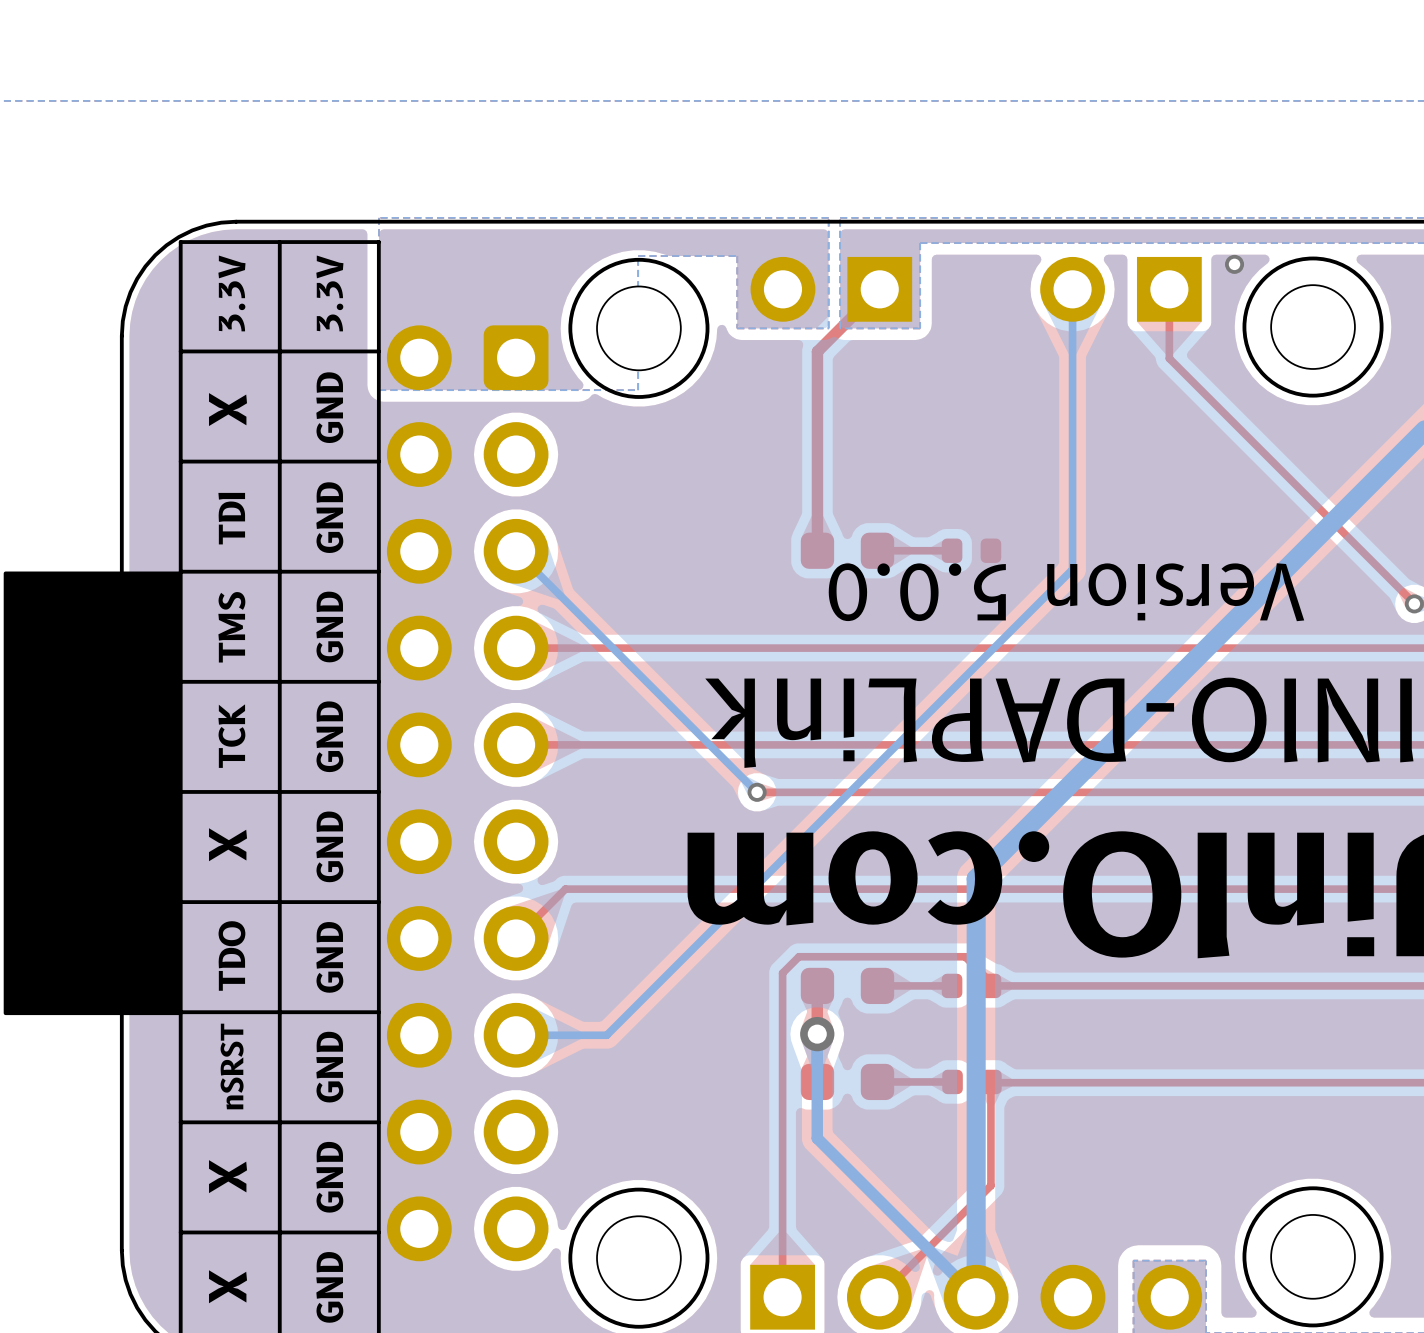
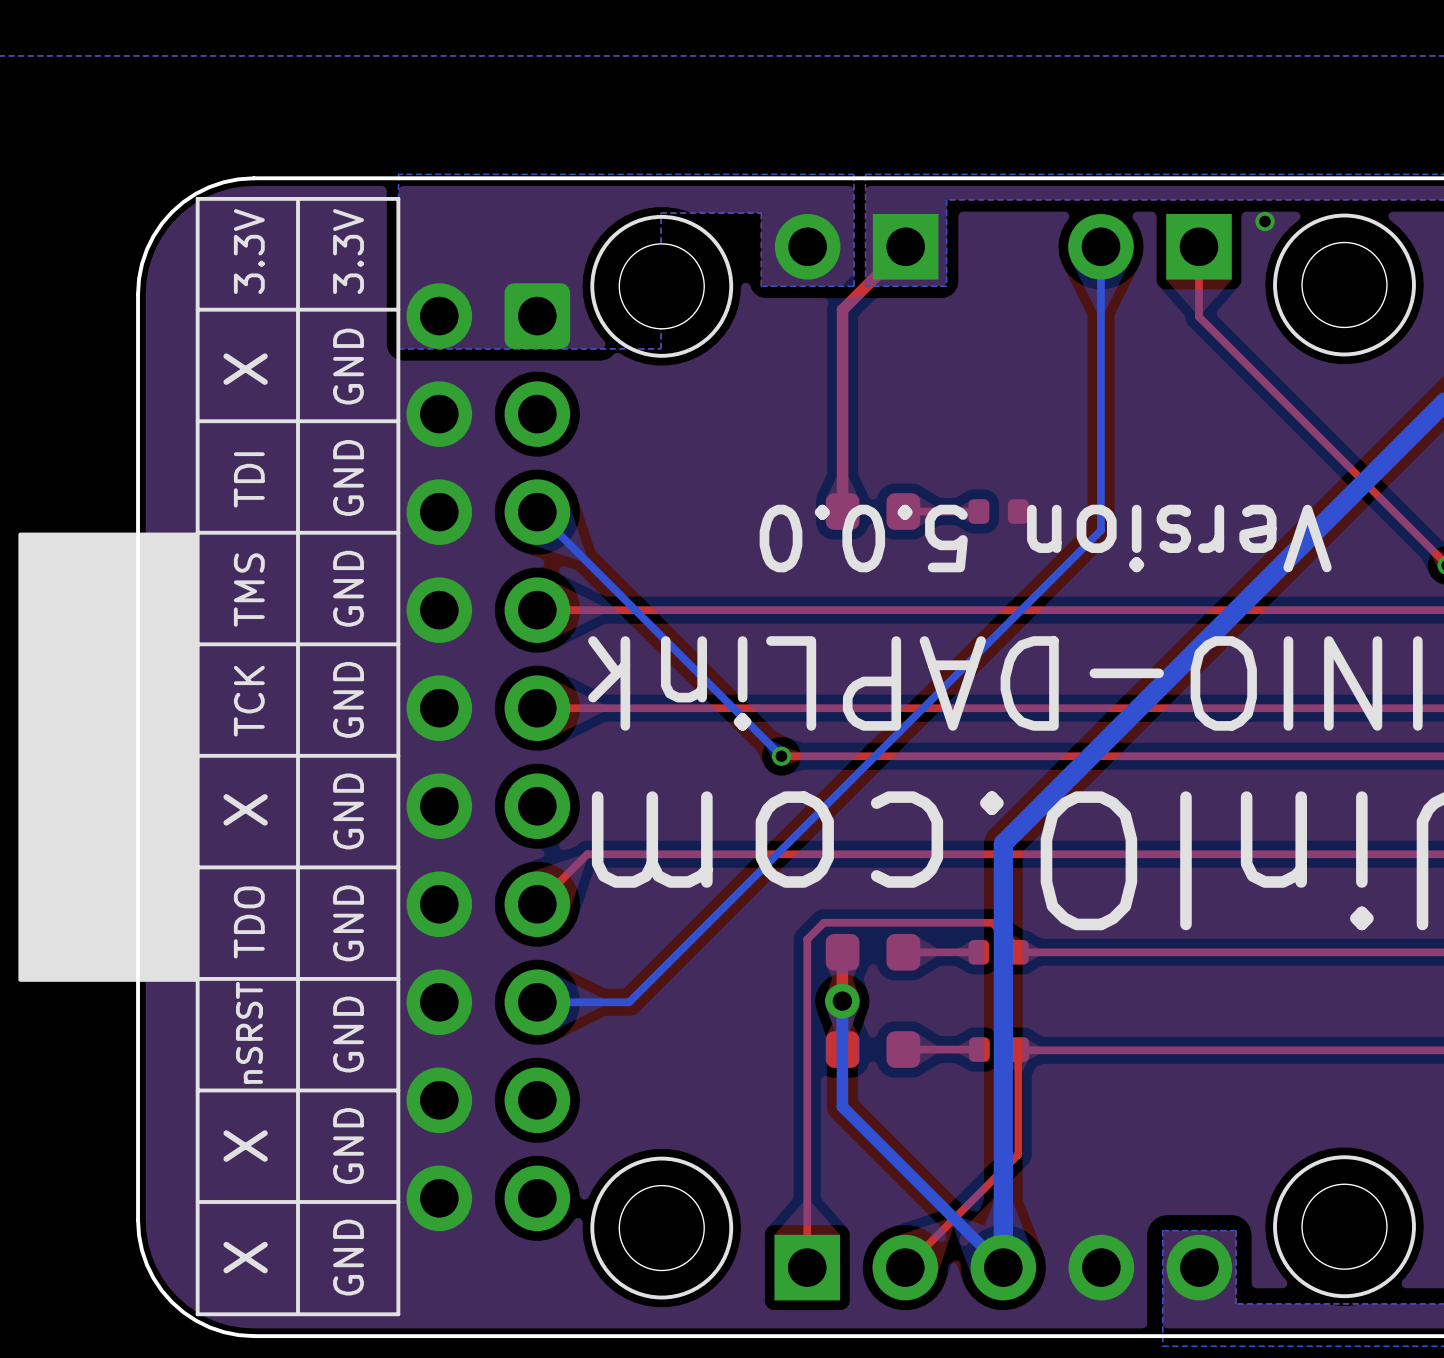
text position: Version 5.0.0 (1066, 592) -> Version 5.0.0 (1045, 538)

